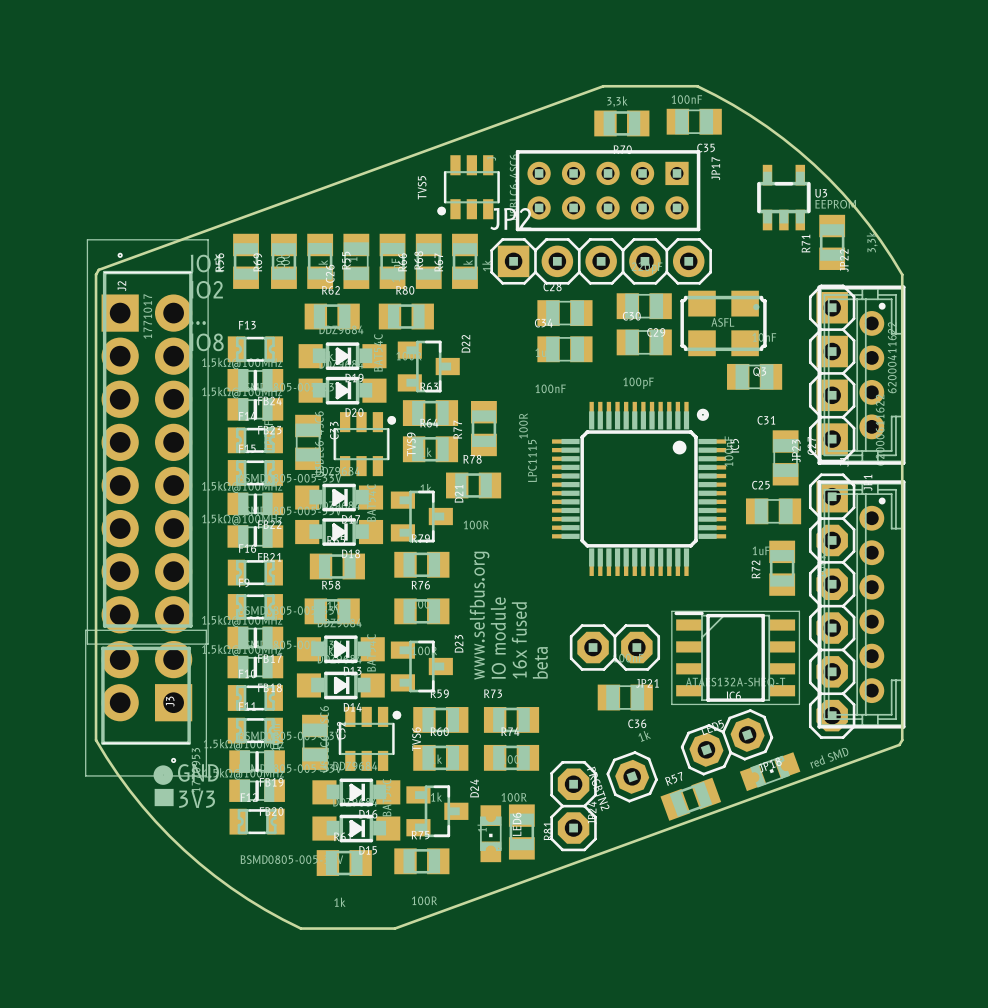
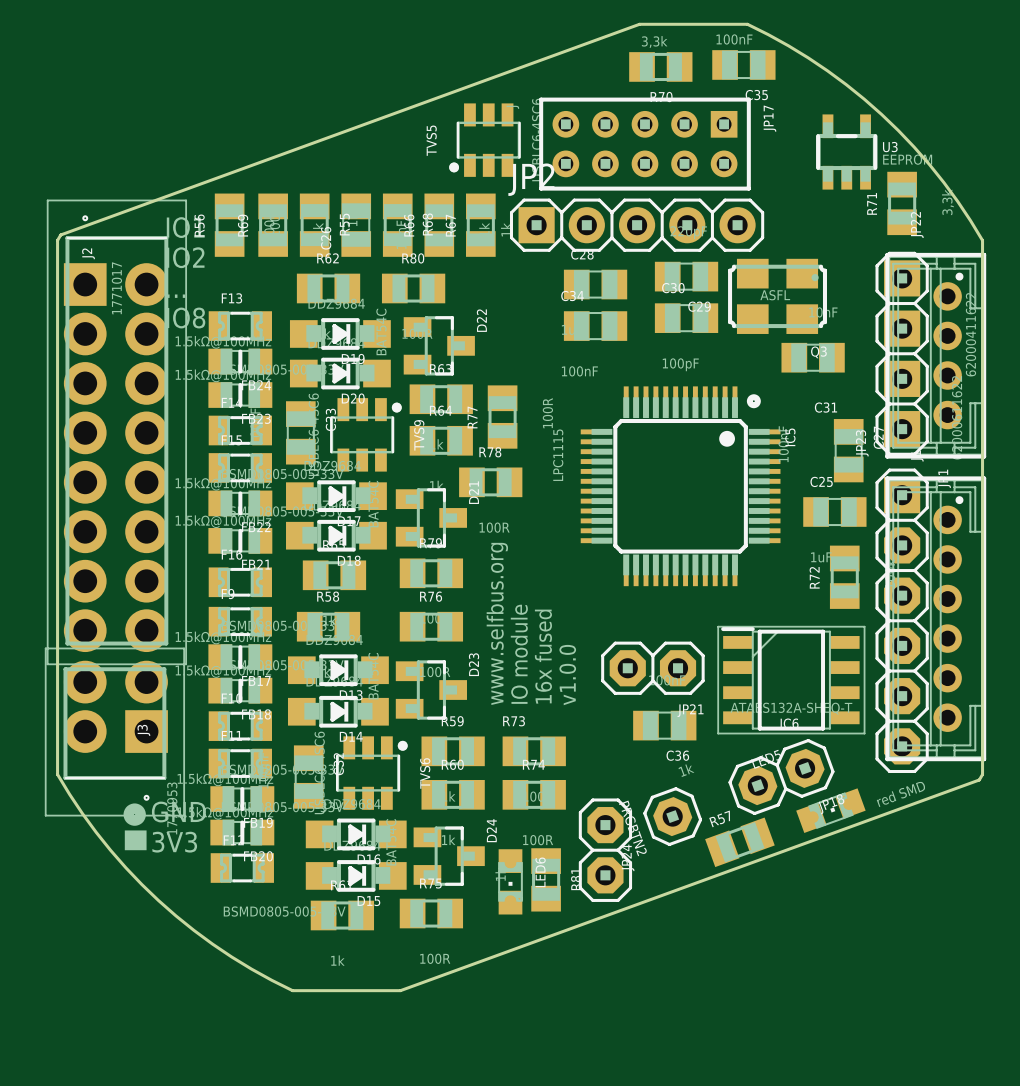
text: beta (540, 662) -> v1.0.0 (567, 675)

